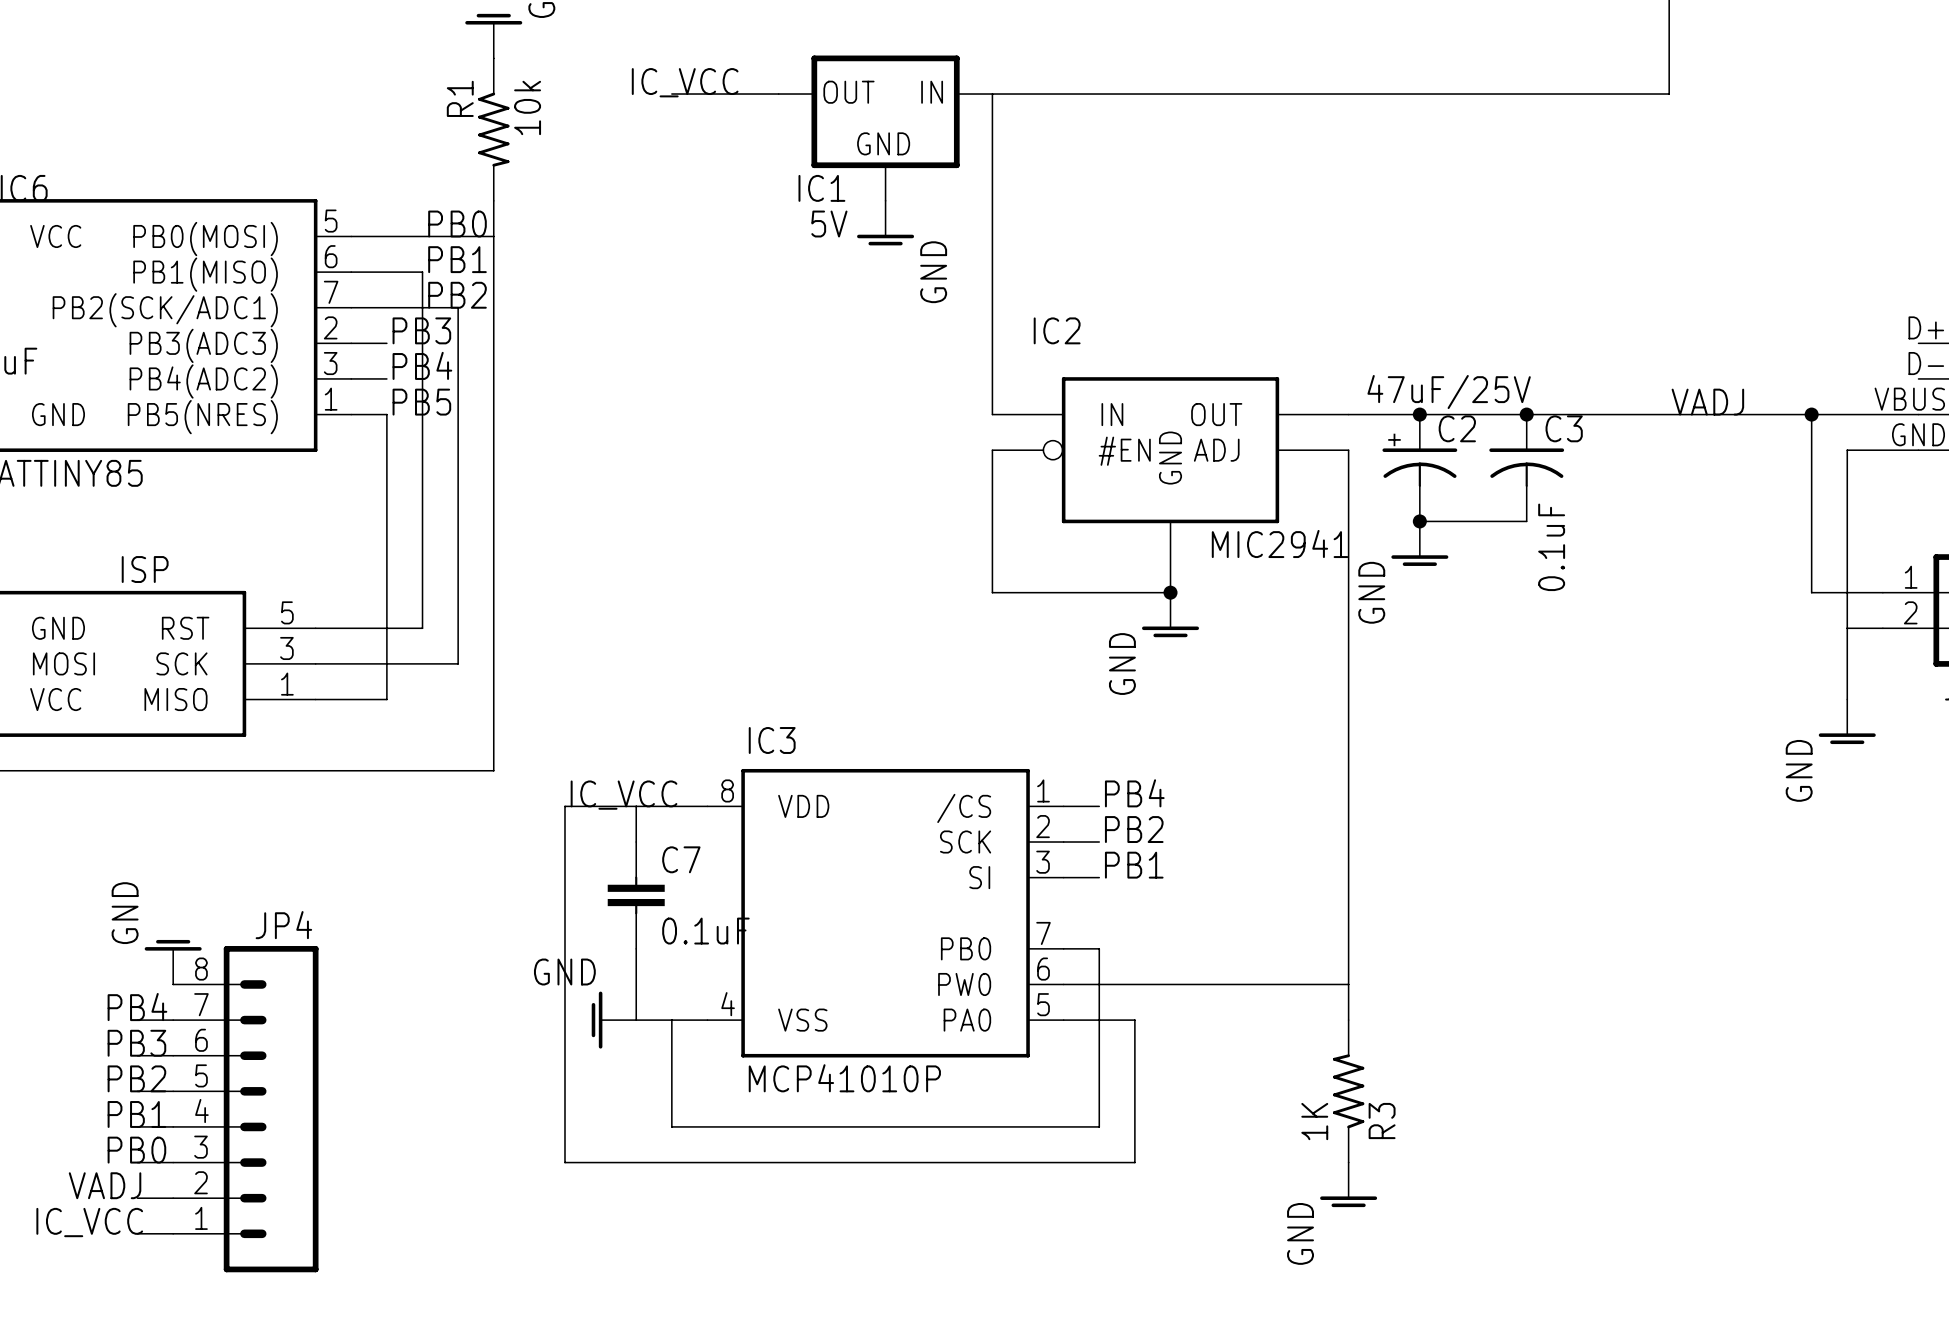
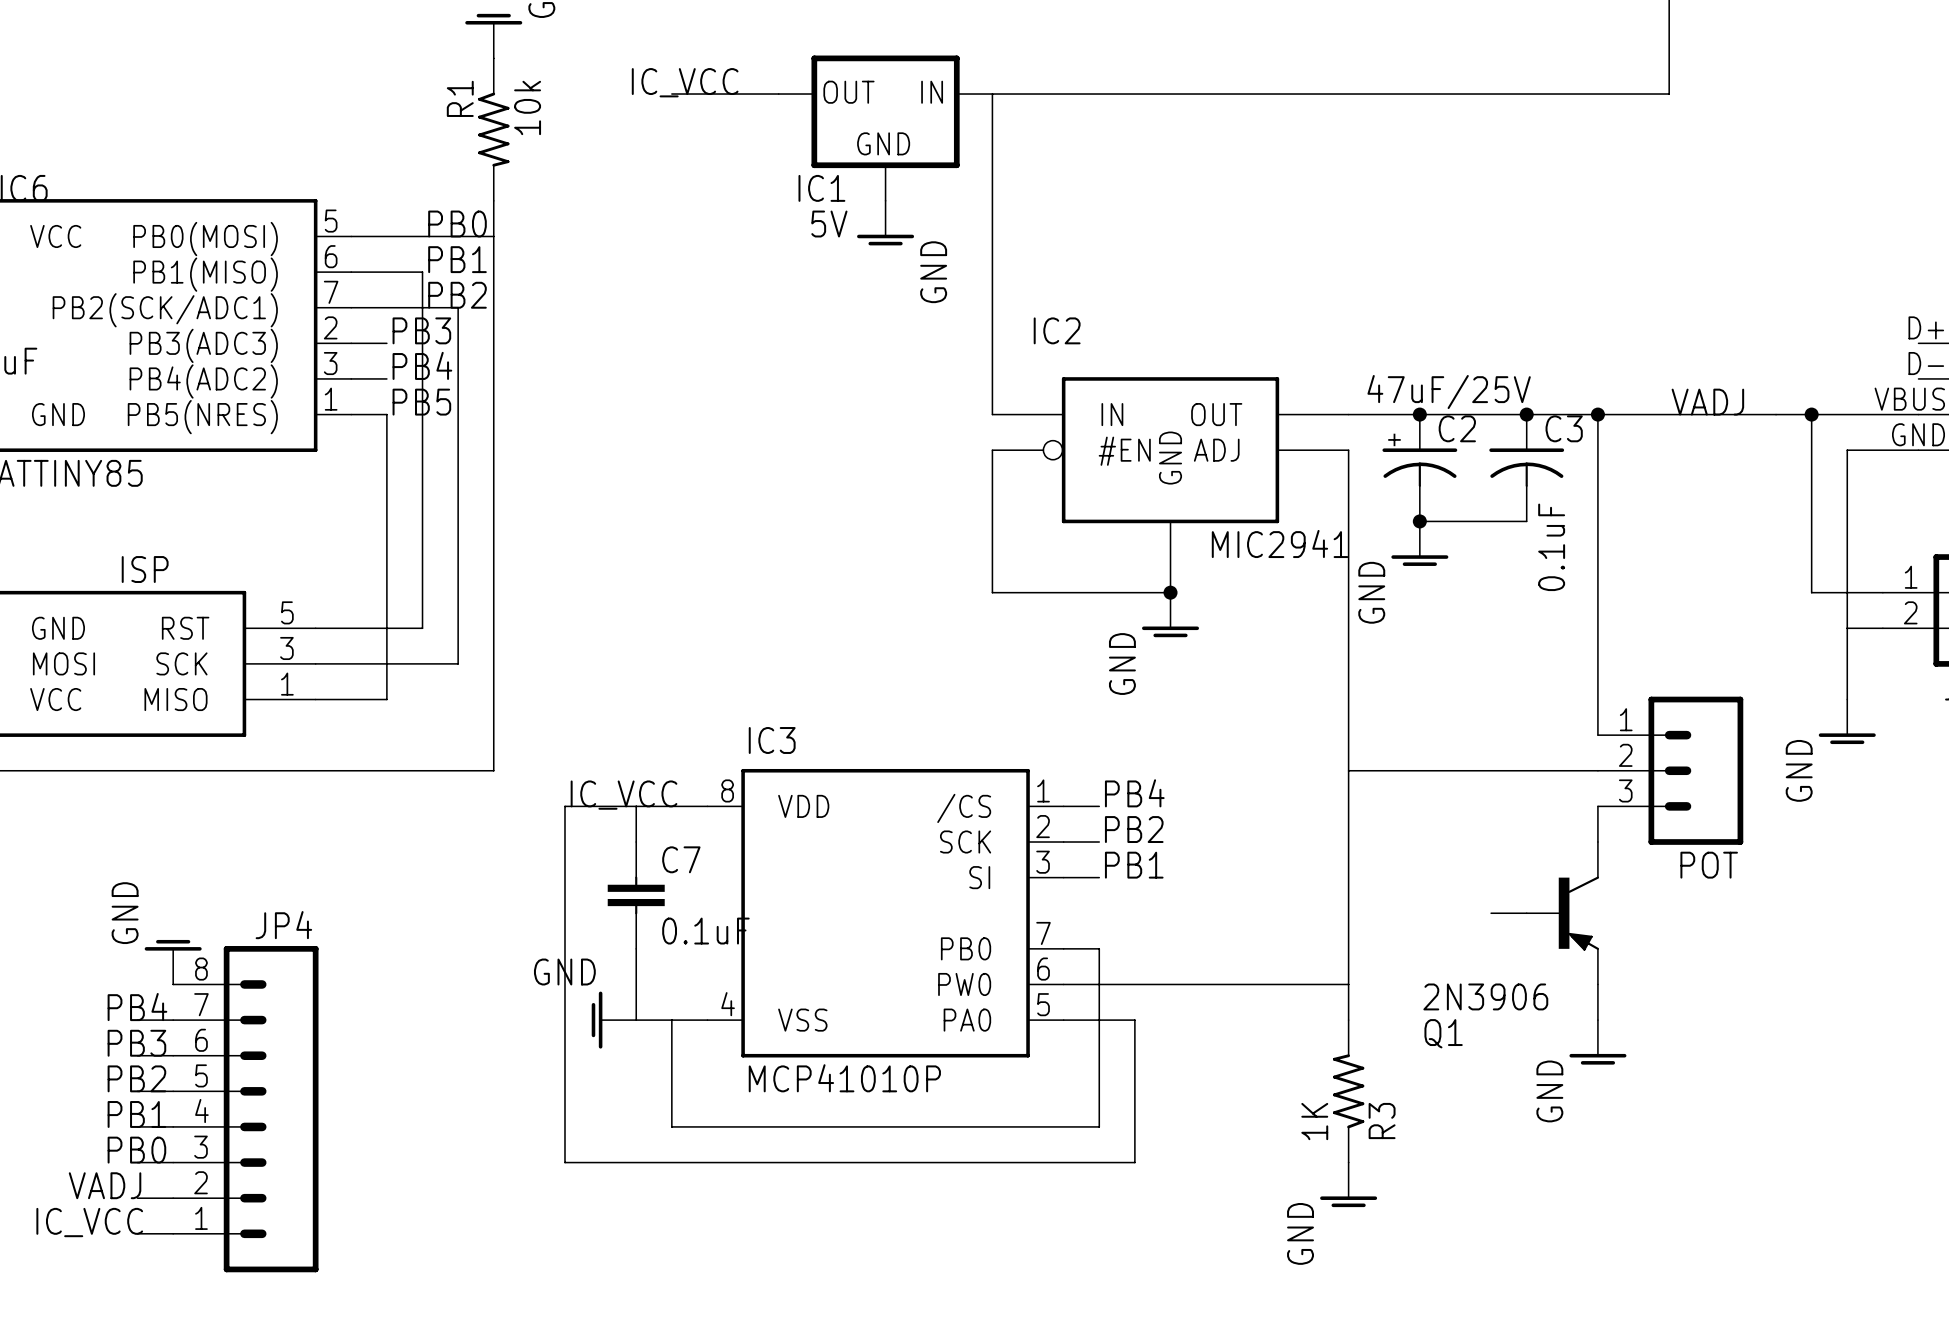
wire: none -> (1597, 414) (1597, 735)
junction: none -> (1597, 414)
wire: none -> (1348, 770) (1597, 770)
POT: none -> (1670, 770)
wire: none -> (1597, 806) (1597, 842)
wire: none -> (1491, 913) (1526, 913)
Q1: none -> 2N3906 (1562, 913)
wire: none -> (1597, 984) (1597, 1020)
power symbol: none -> GND (1597, 1042)

